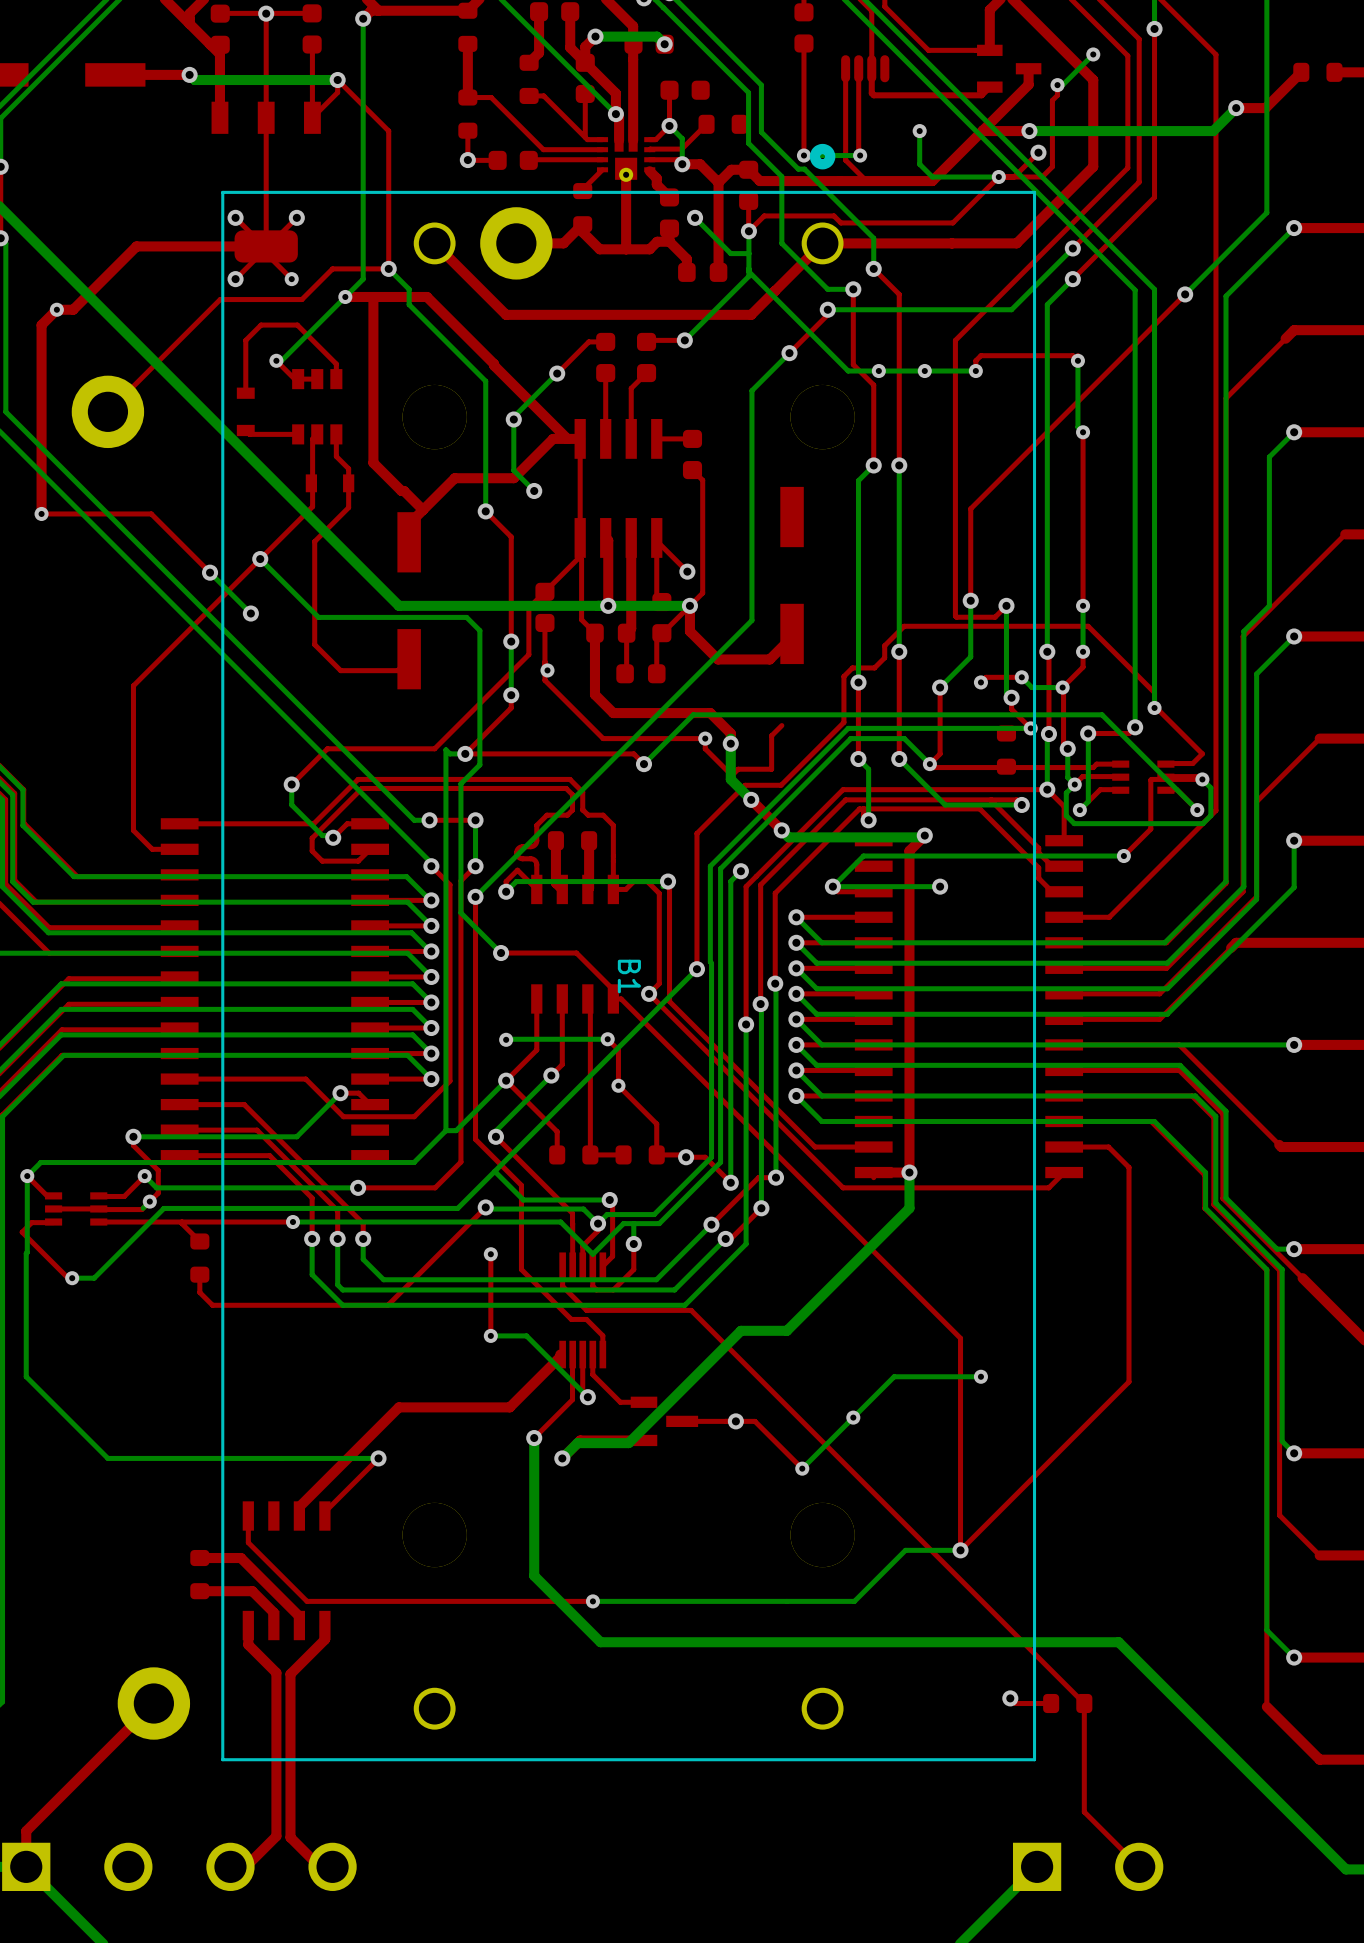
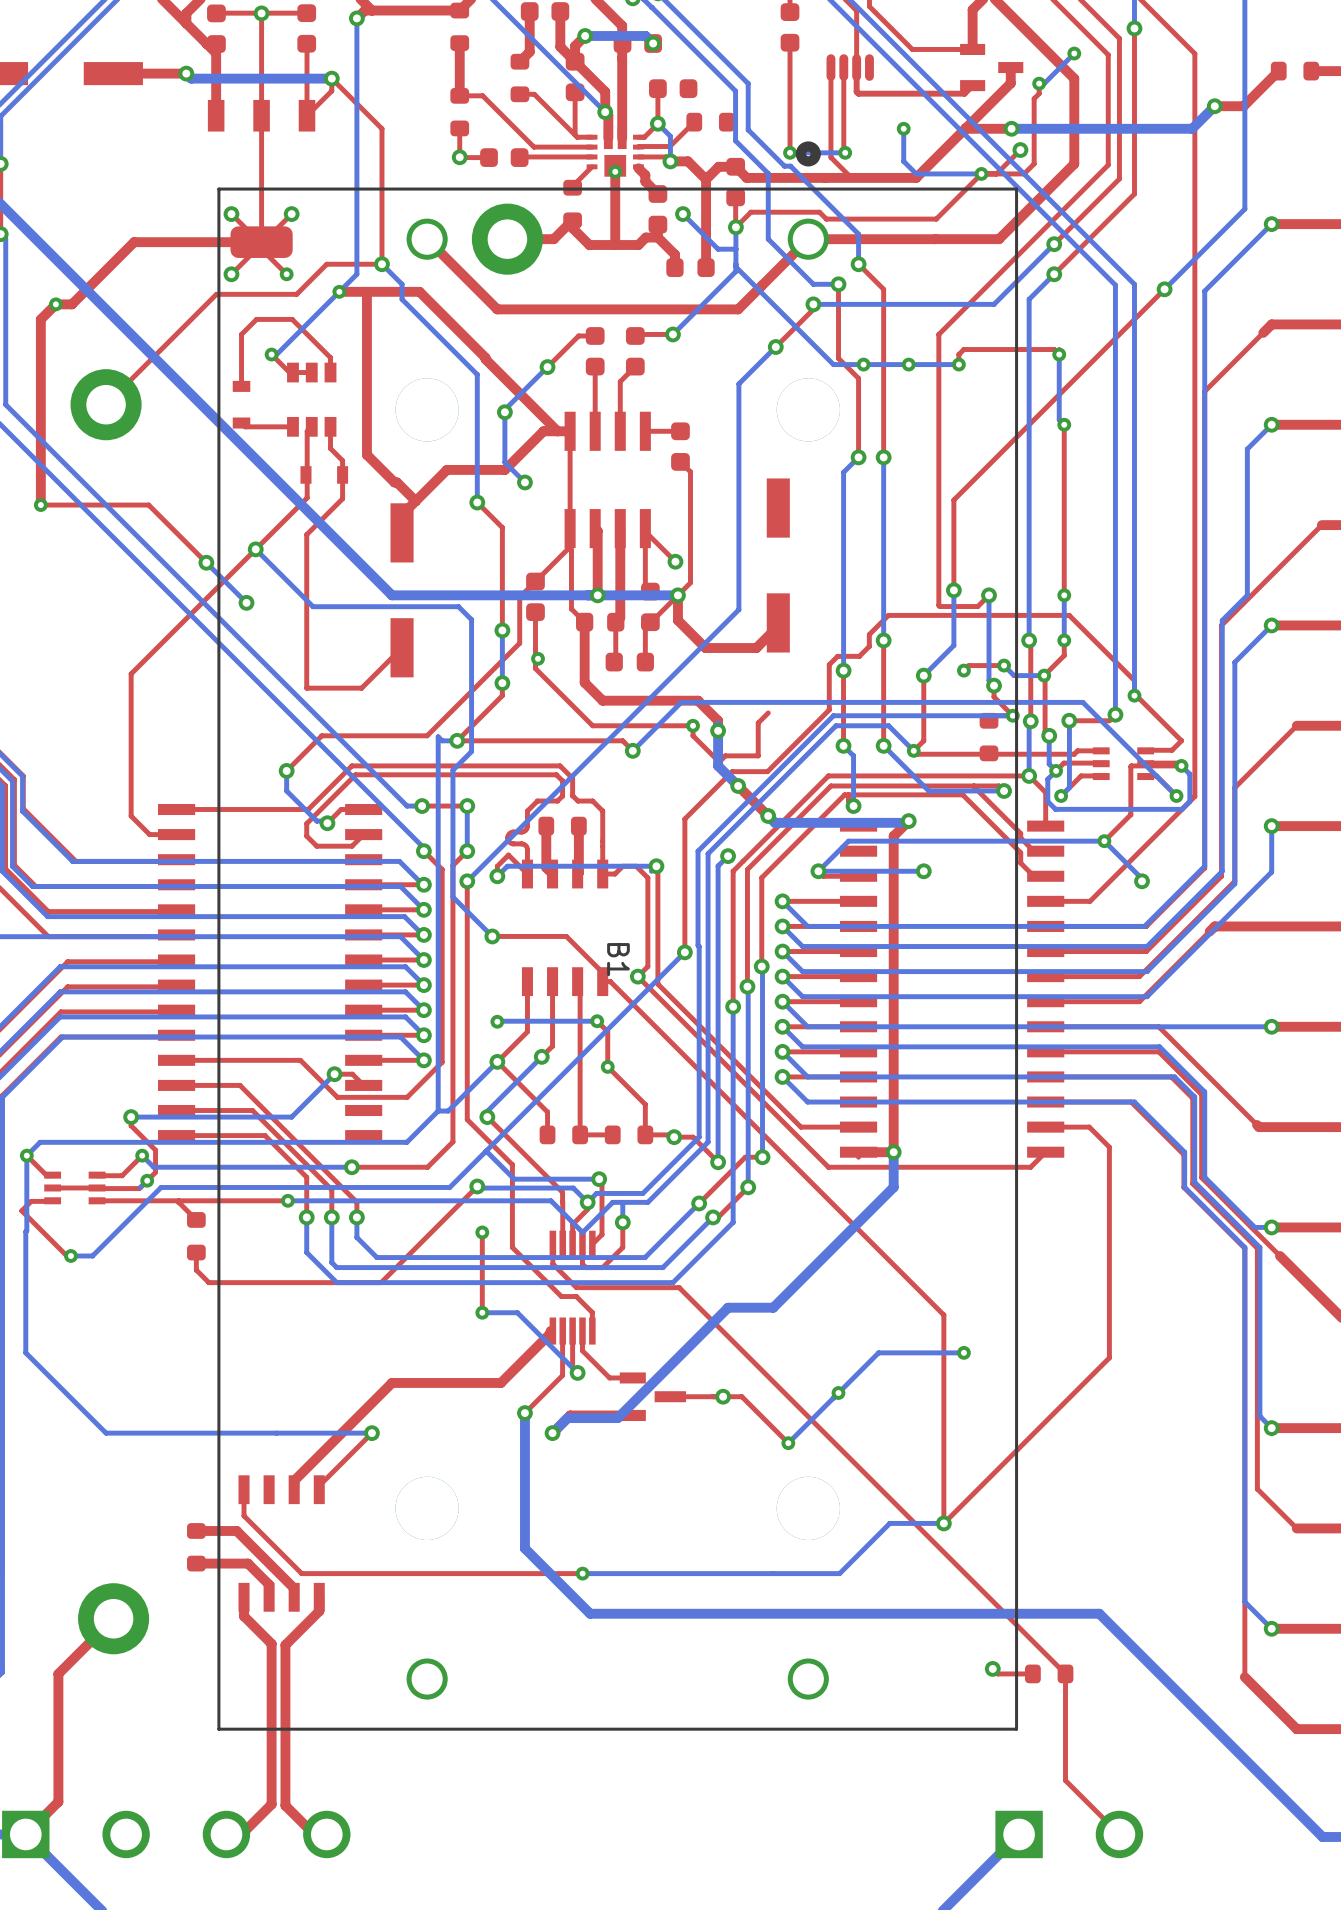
top track: (314, 541) (314, 644) (340, 670) (397, 670) -> (309, 532) (306, 534) (306, 688) (361, 688) (390, 659)
bottom track: none -> (1104, 841) (1142, 878) (1142, 881)
via: none -> (1142, 881)
top track: (153, 1703) (26, 1831) (26, 1866) -> (113, 1618) (58, 1673) (58, 1801) (25, 1834)
part position: (153, 1703) -> (113, 1618)

